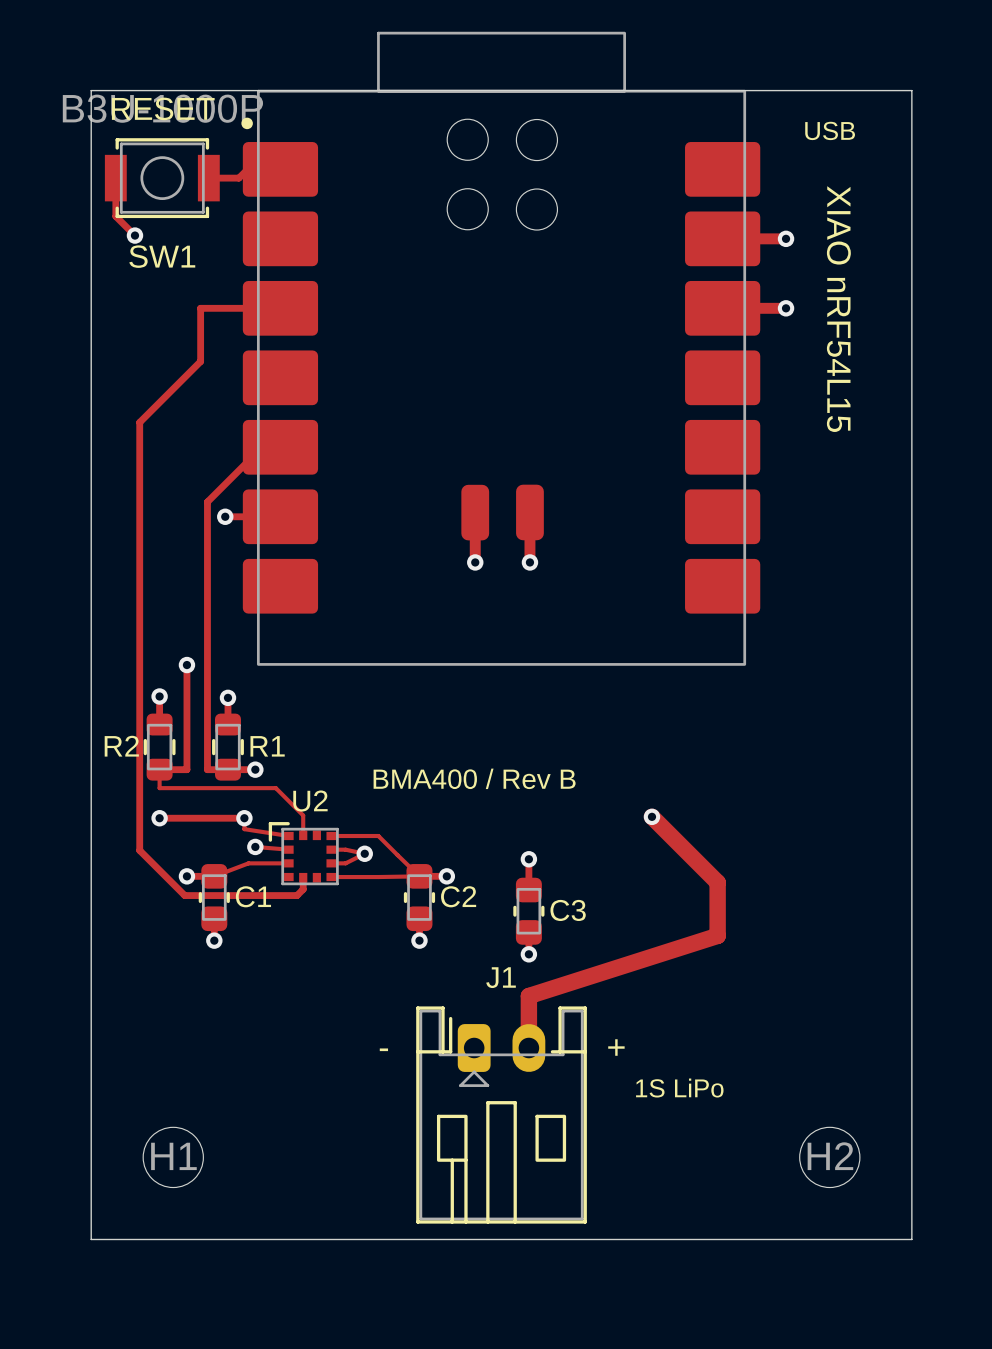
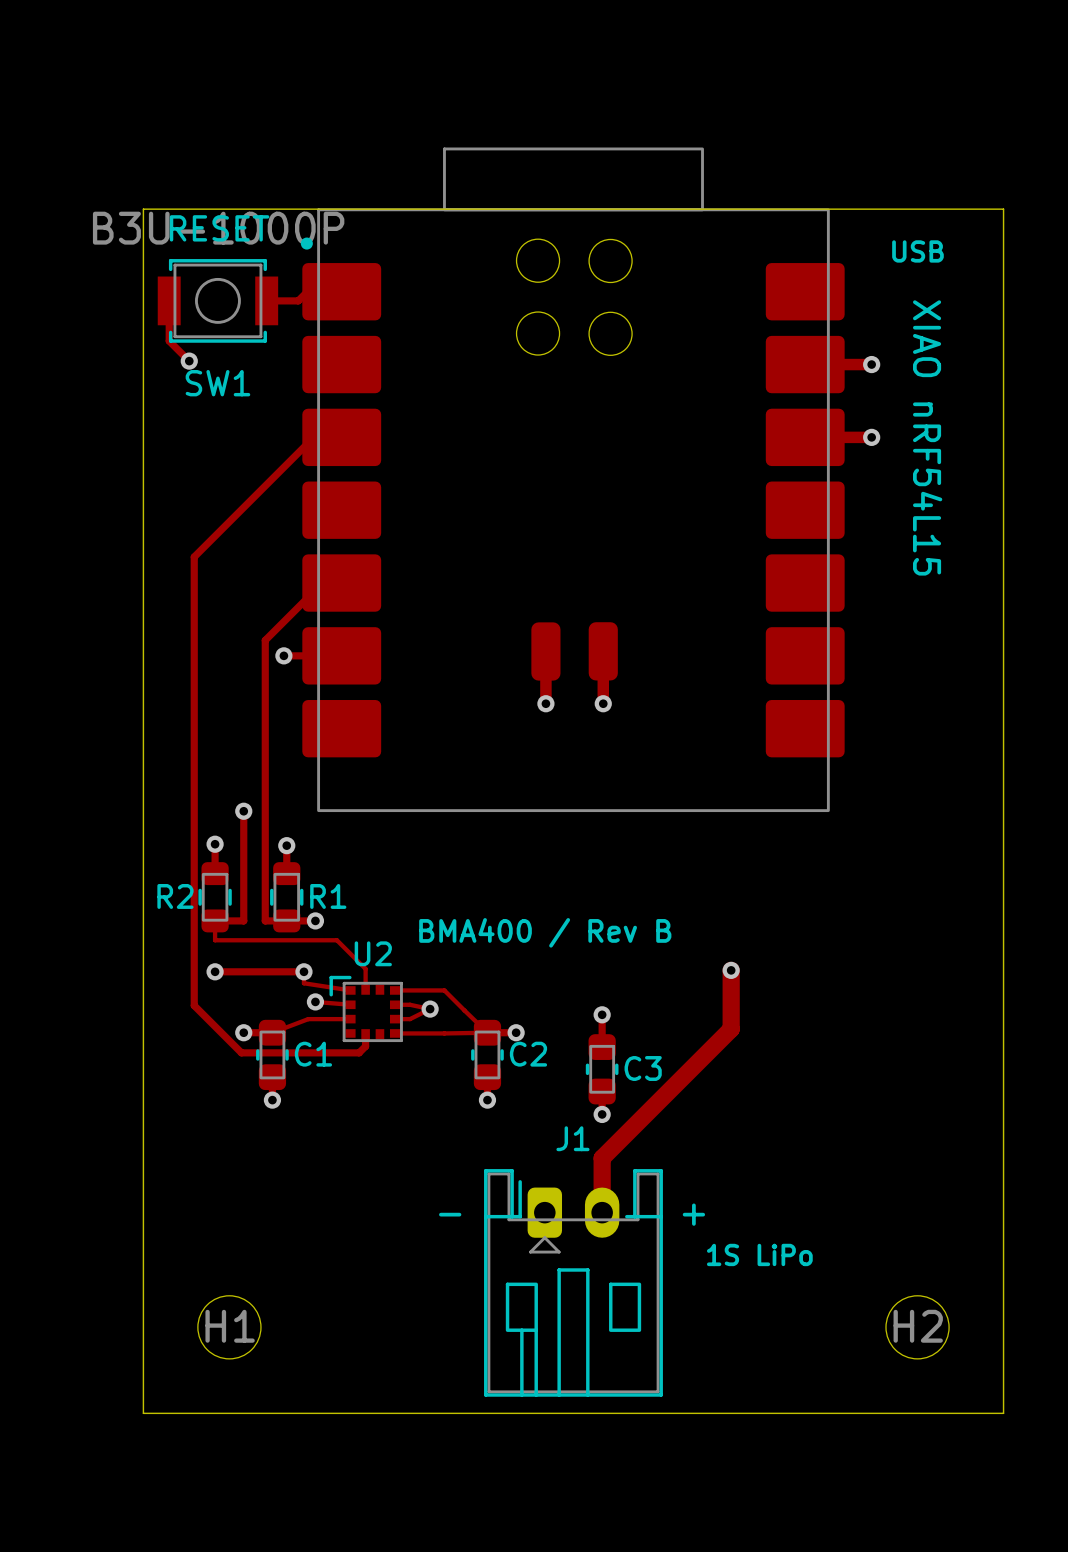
track: (253, 308) (200, 308) (200, 361) -> (313, 437) (258, 493)
track: (651, 816) (717, 882) (717, 935) (528, 996) -> (731, 970) (731, 1029) (602, 1158)

